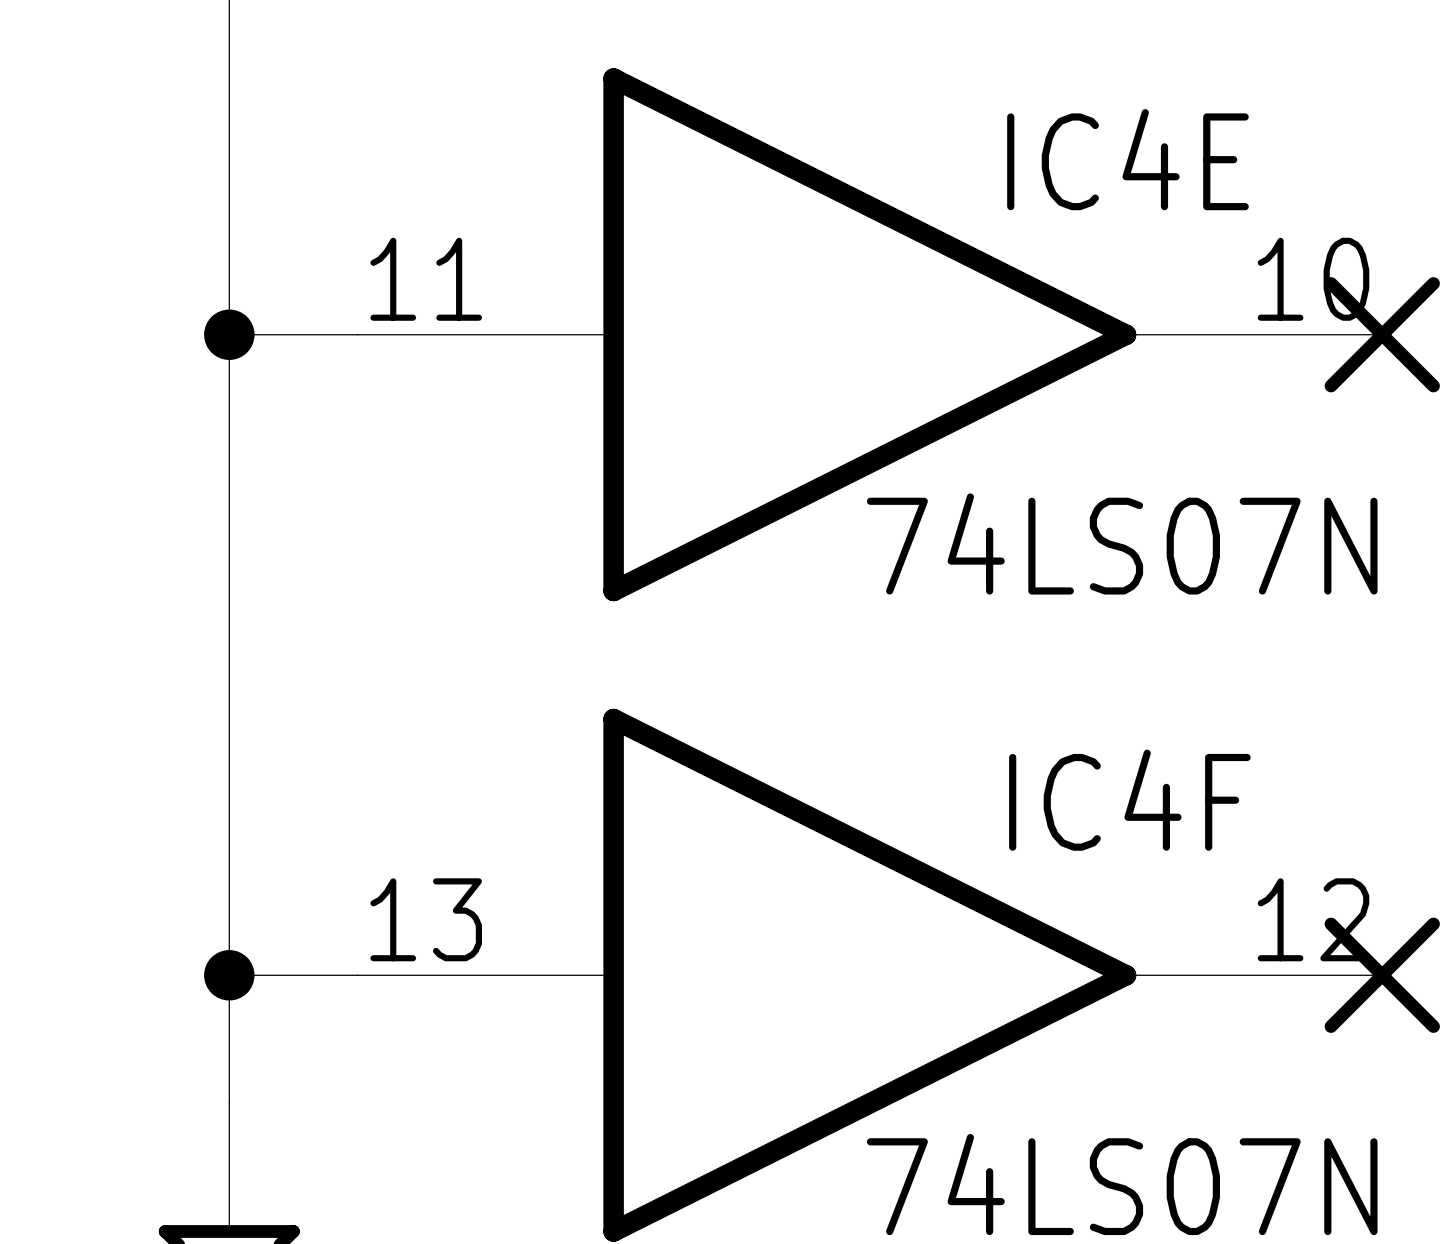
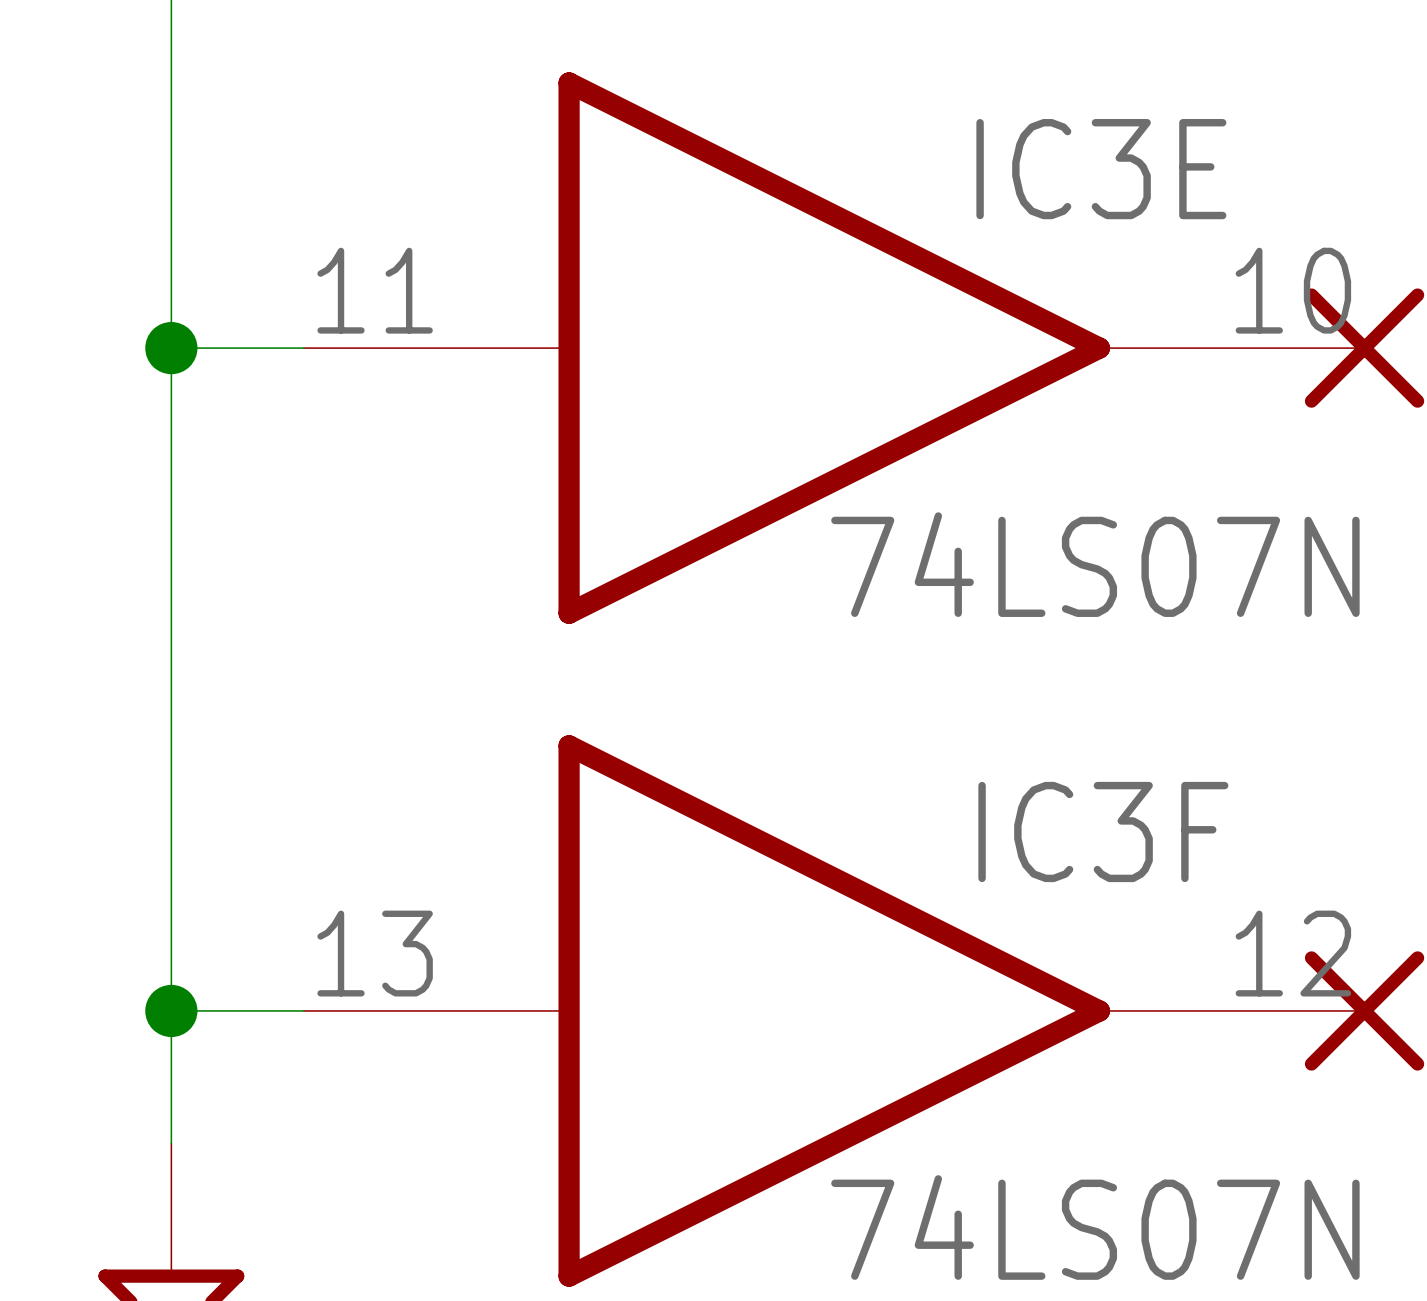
IC4E name: IC4E (1127, 159) -> IC3E (1101, 169)
IC4F name: IC4F (1129, 800) -> IC3F (1103, 831)

